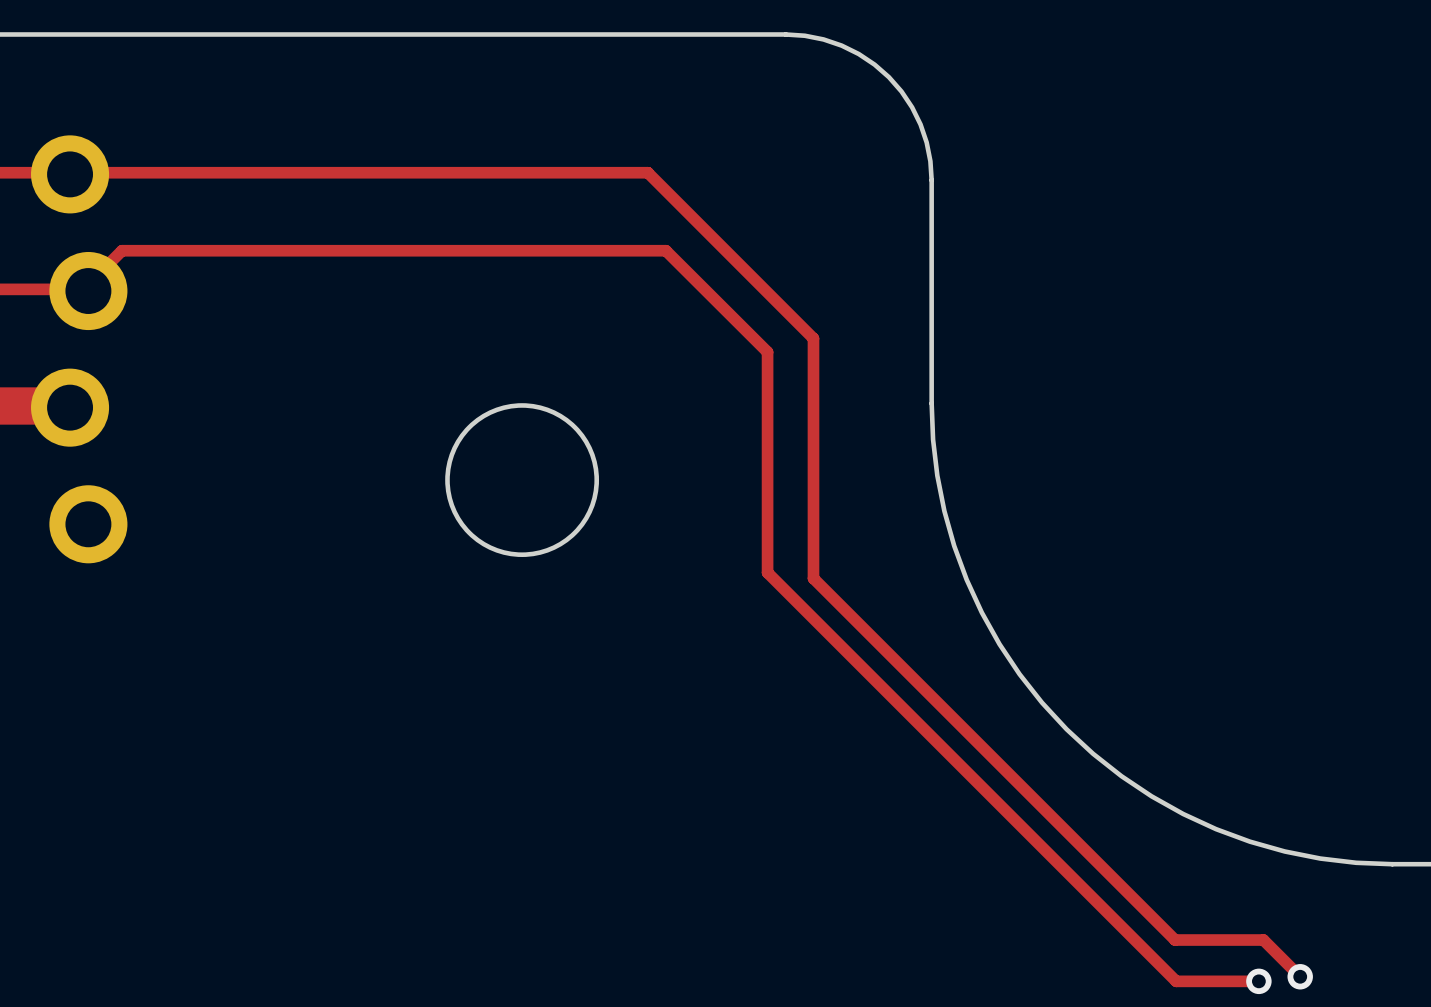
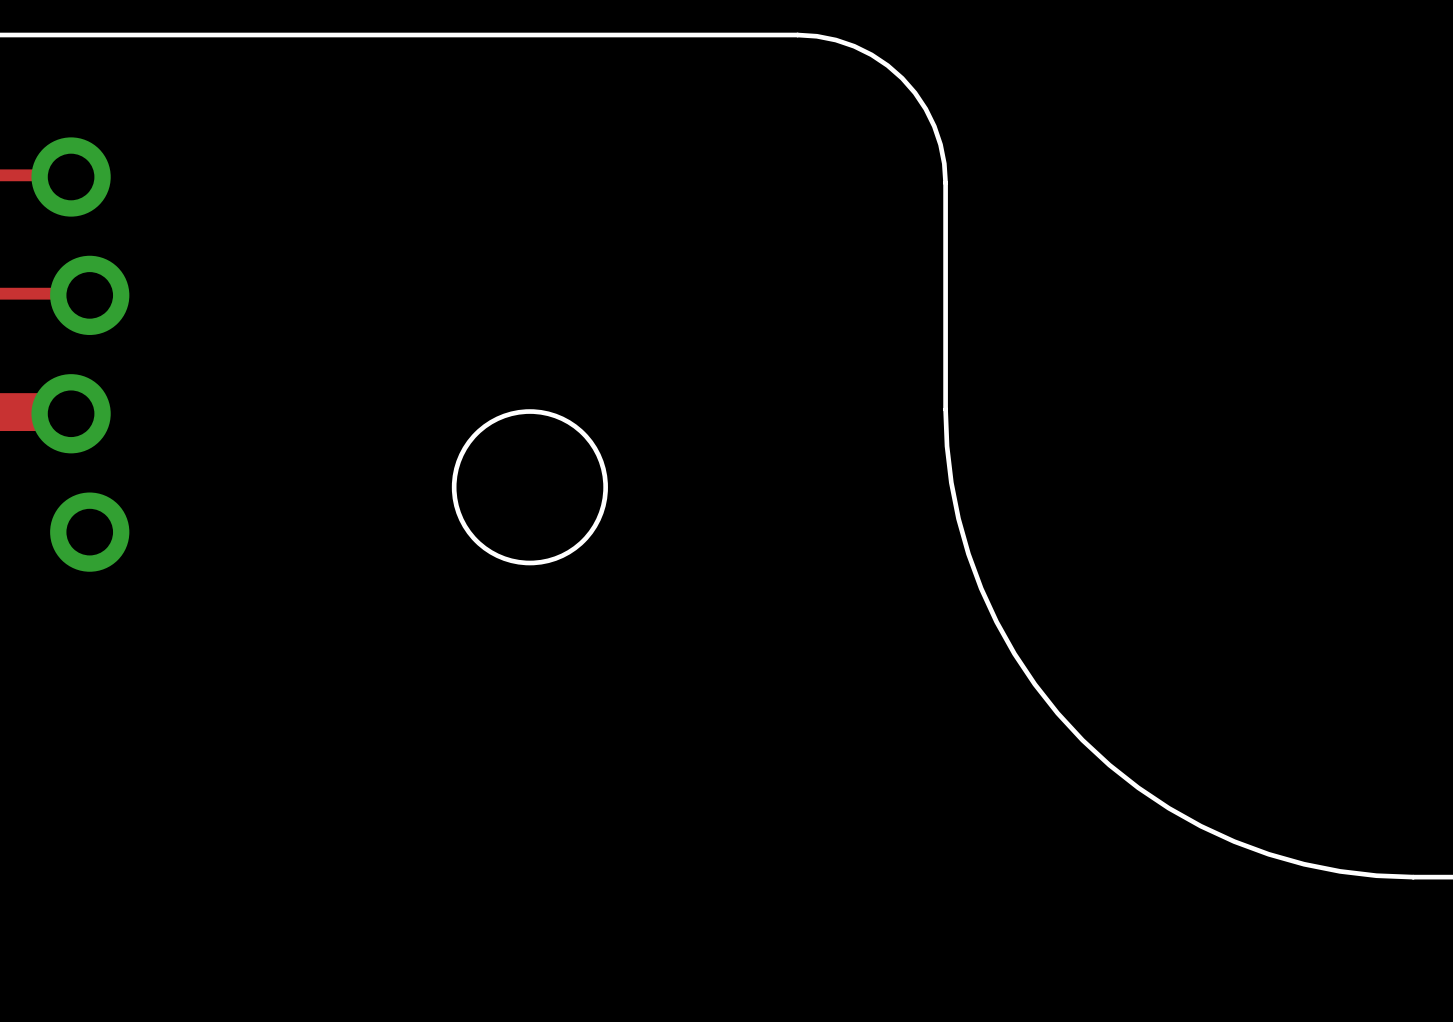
track: (83, 172) (647, 172) -> none
track: (648, 173) (813, 338) (813, 578) (1175, 940) (1263, 940) (1300, 976) -> none
track: (83, 289) (122, 250) (665, 250) (767, 352) (767, 572) (1176, 981) (1258, 981) -> none
via: (1300, 976) -> none
via: (1258, 981) -> none

